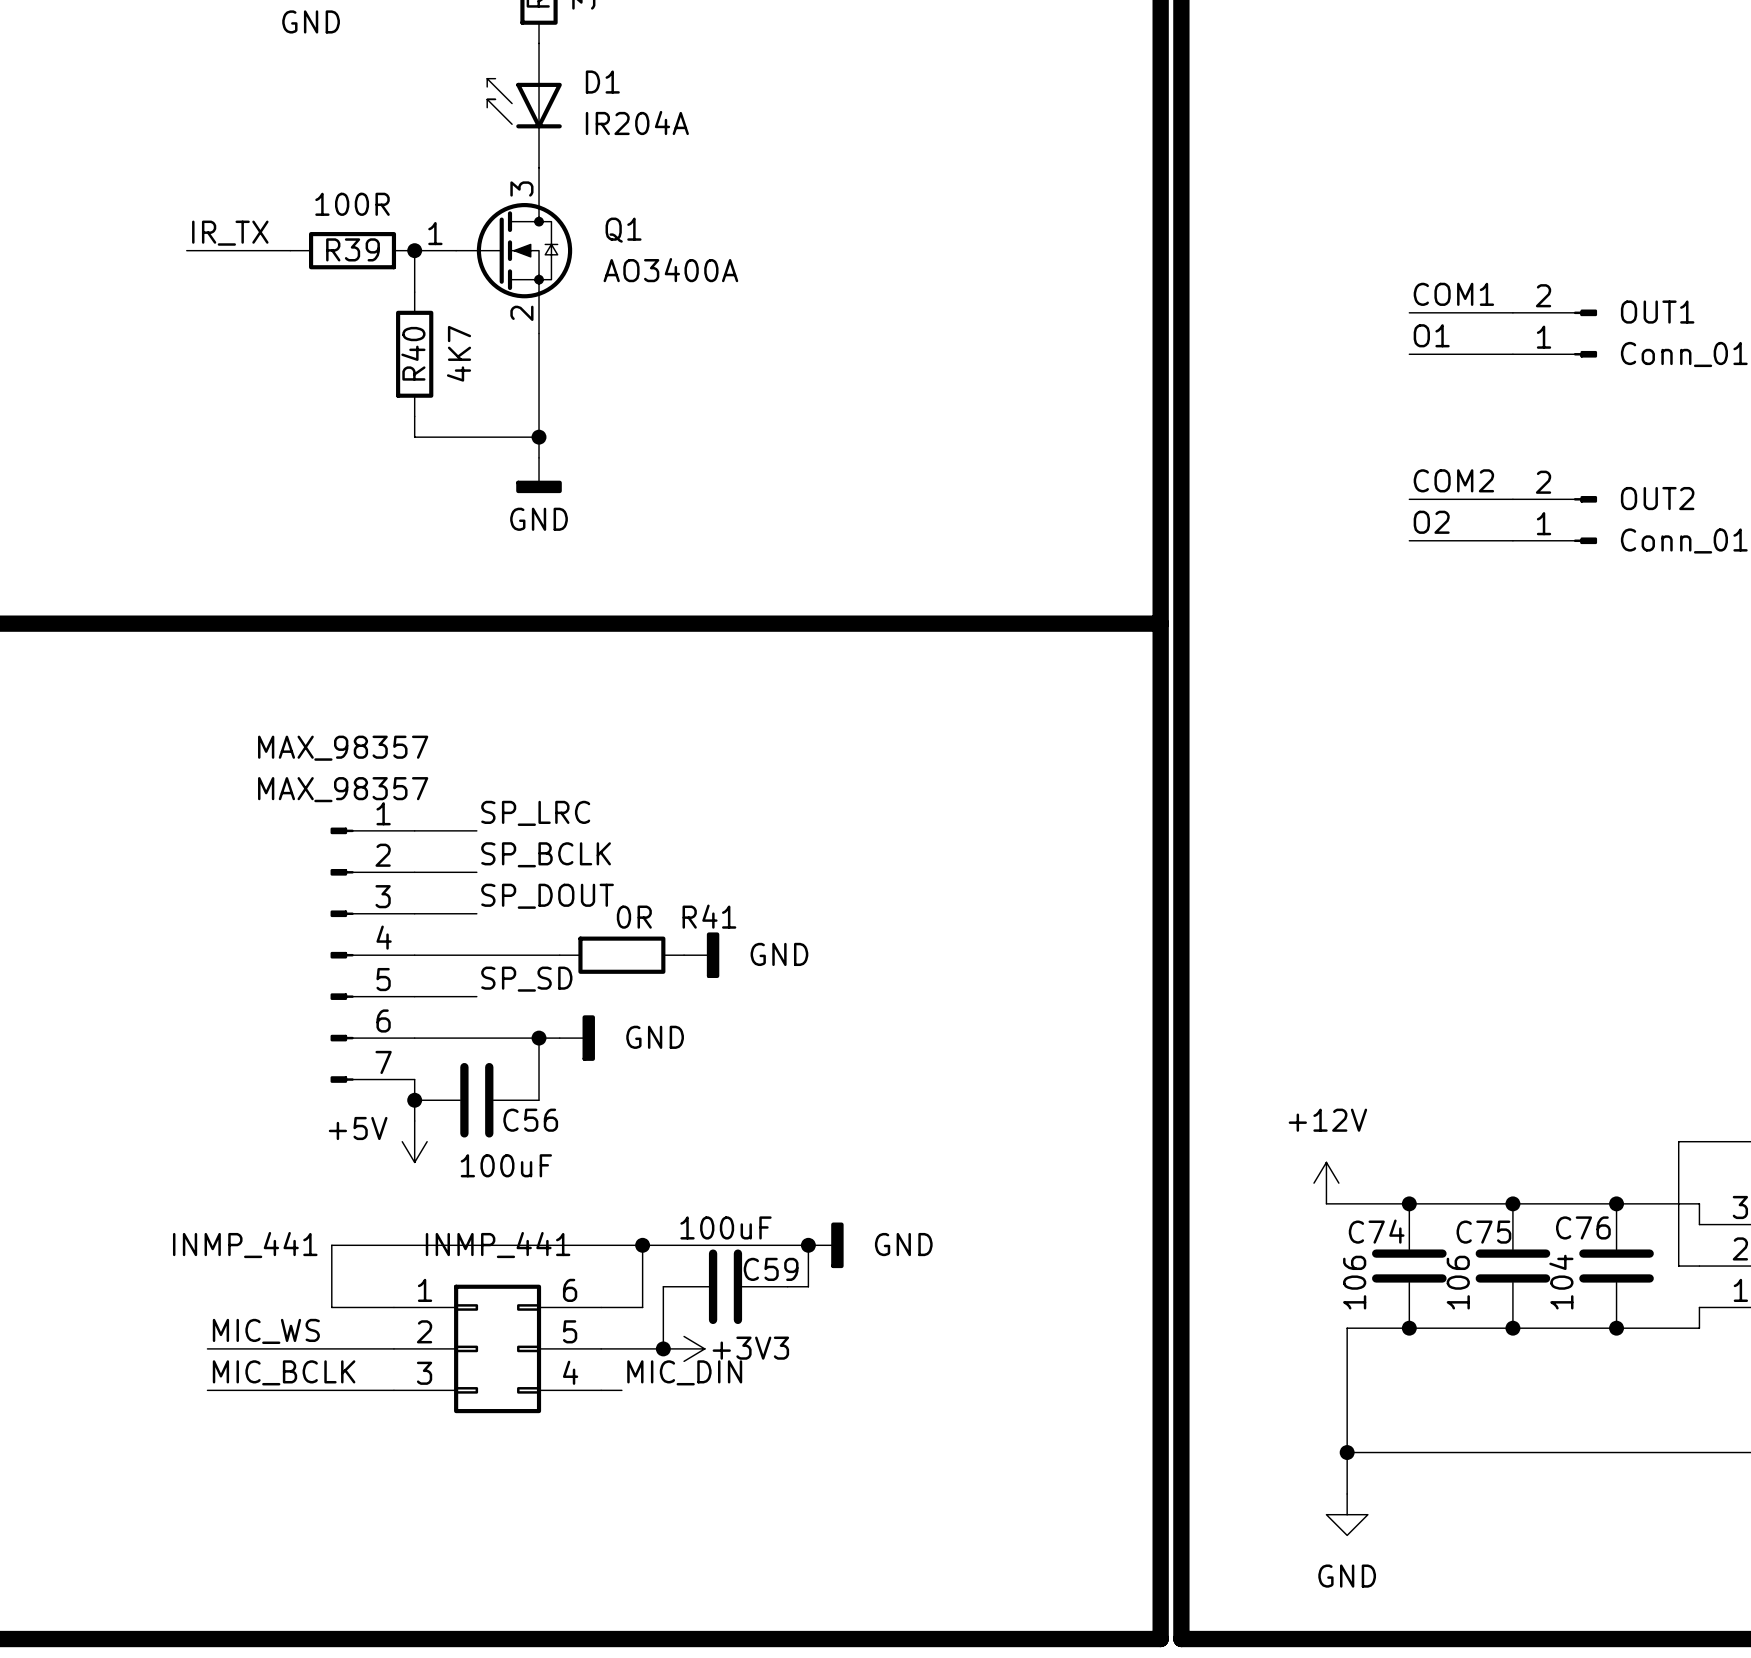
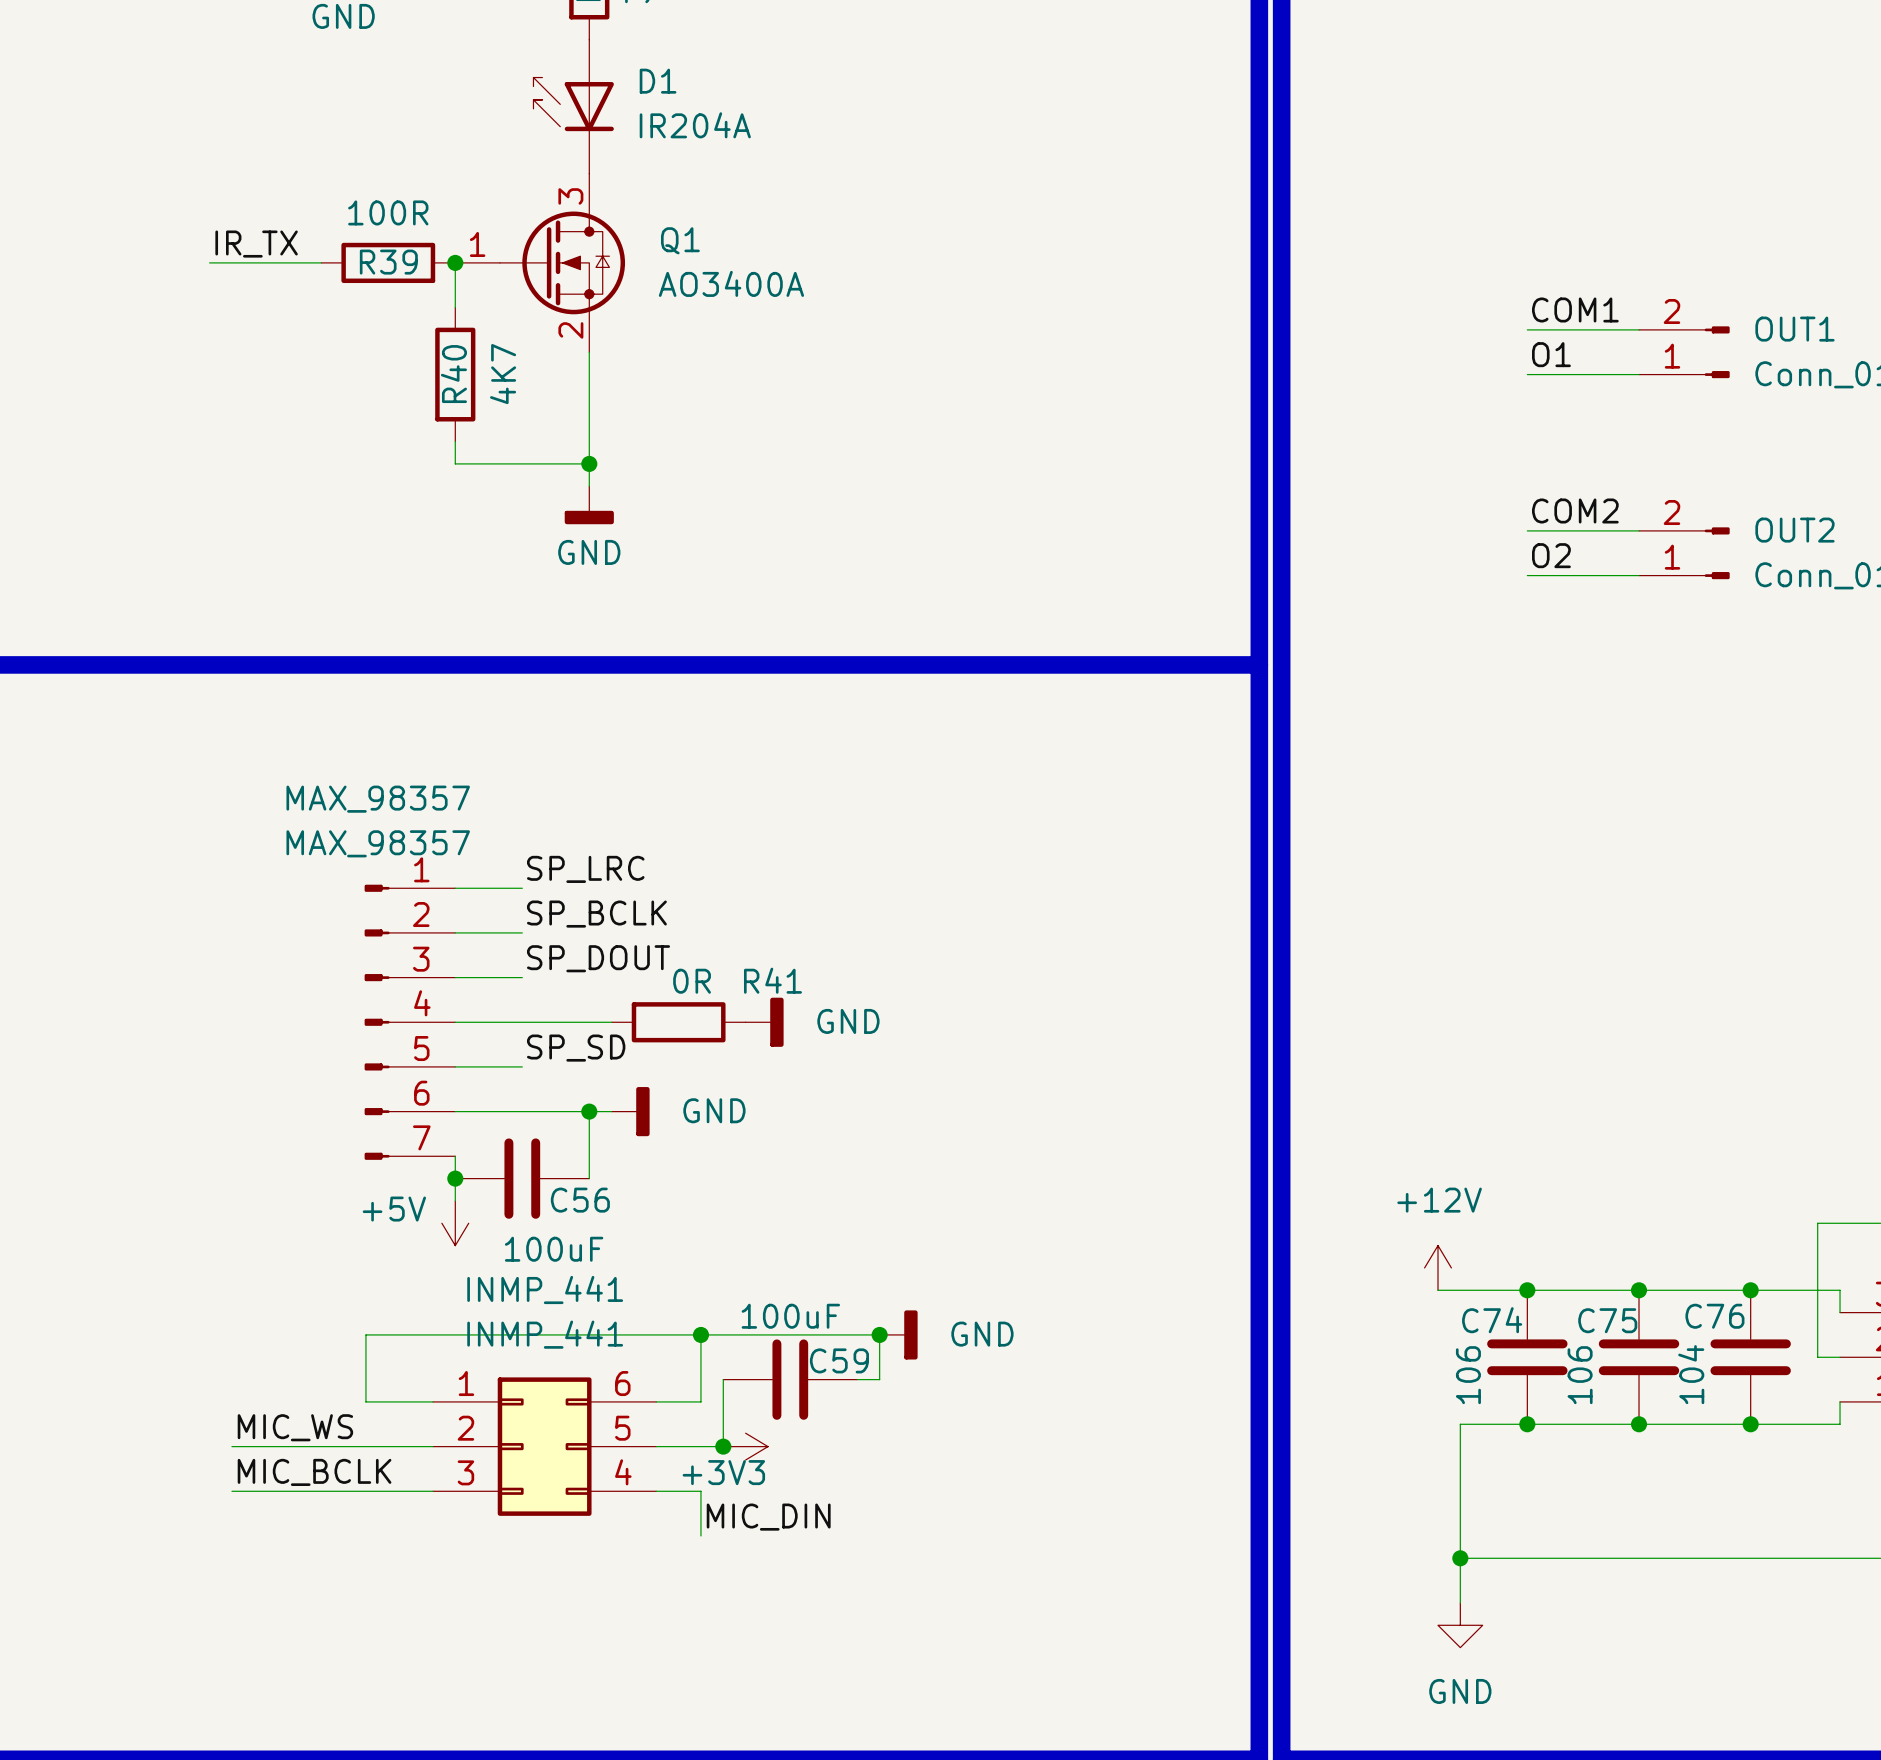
INMP_441 name position: INMP_441 (245, 1245) -> INMP_441 (545, 1289)
power symbol text position: +3V3 (750, 1348) -> +3V3 (723, 1472)
label position: MIC_DIN (684, 1372) -> MIC_DIN (768, 1517)
wire: none -> (678, 1491) (700, 1491) (700, 1535)

